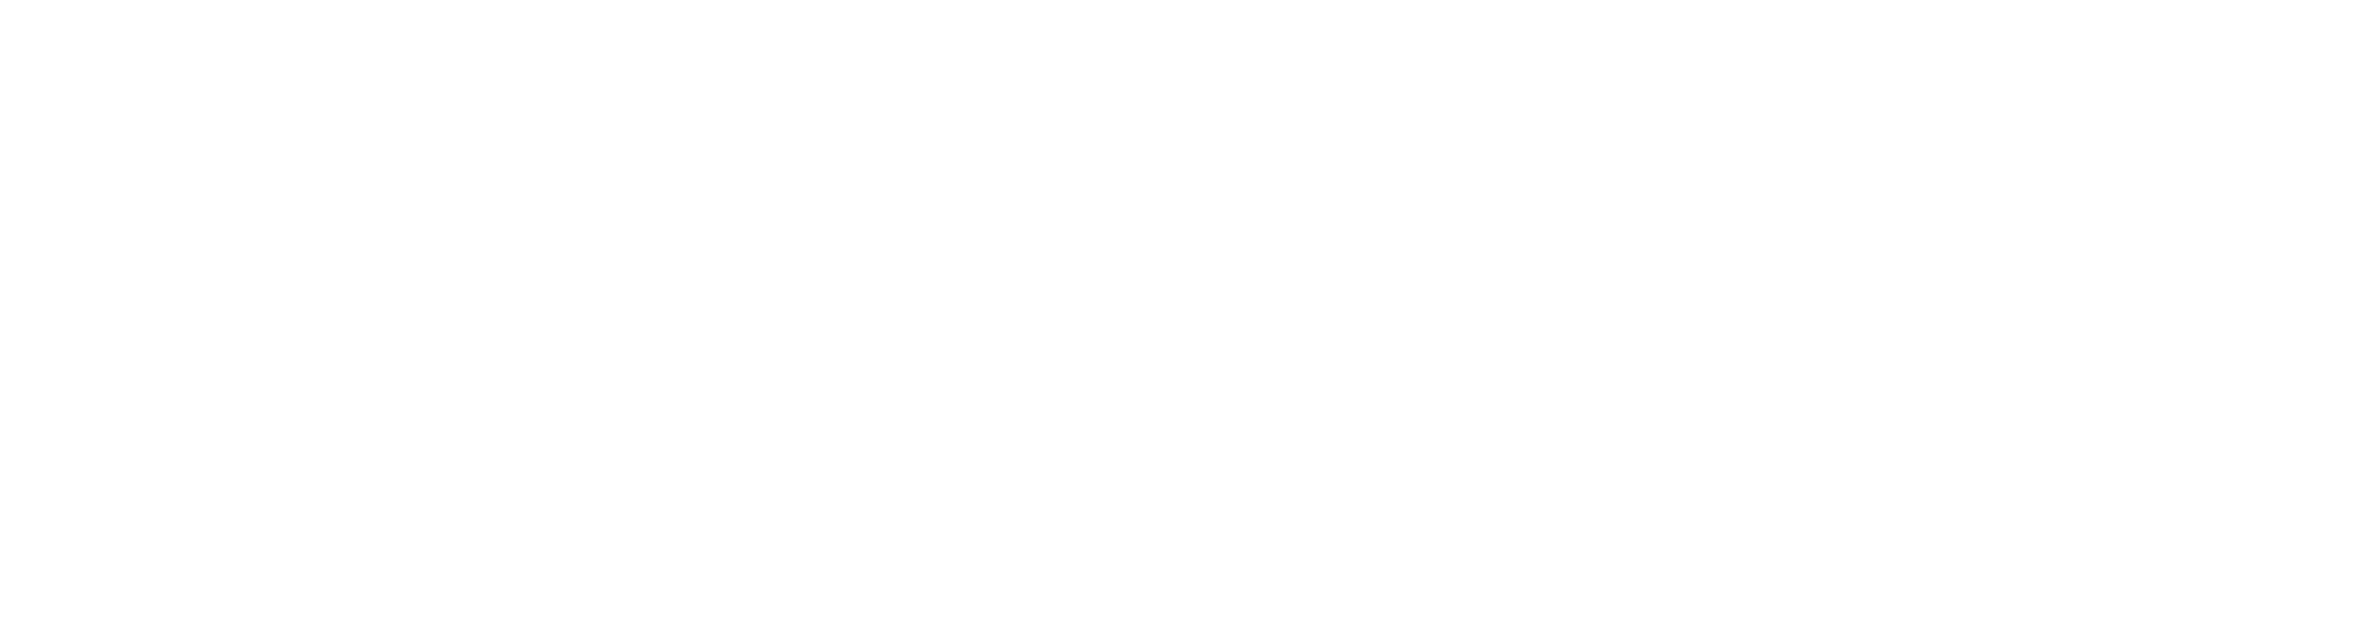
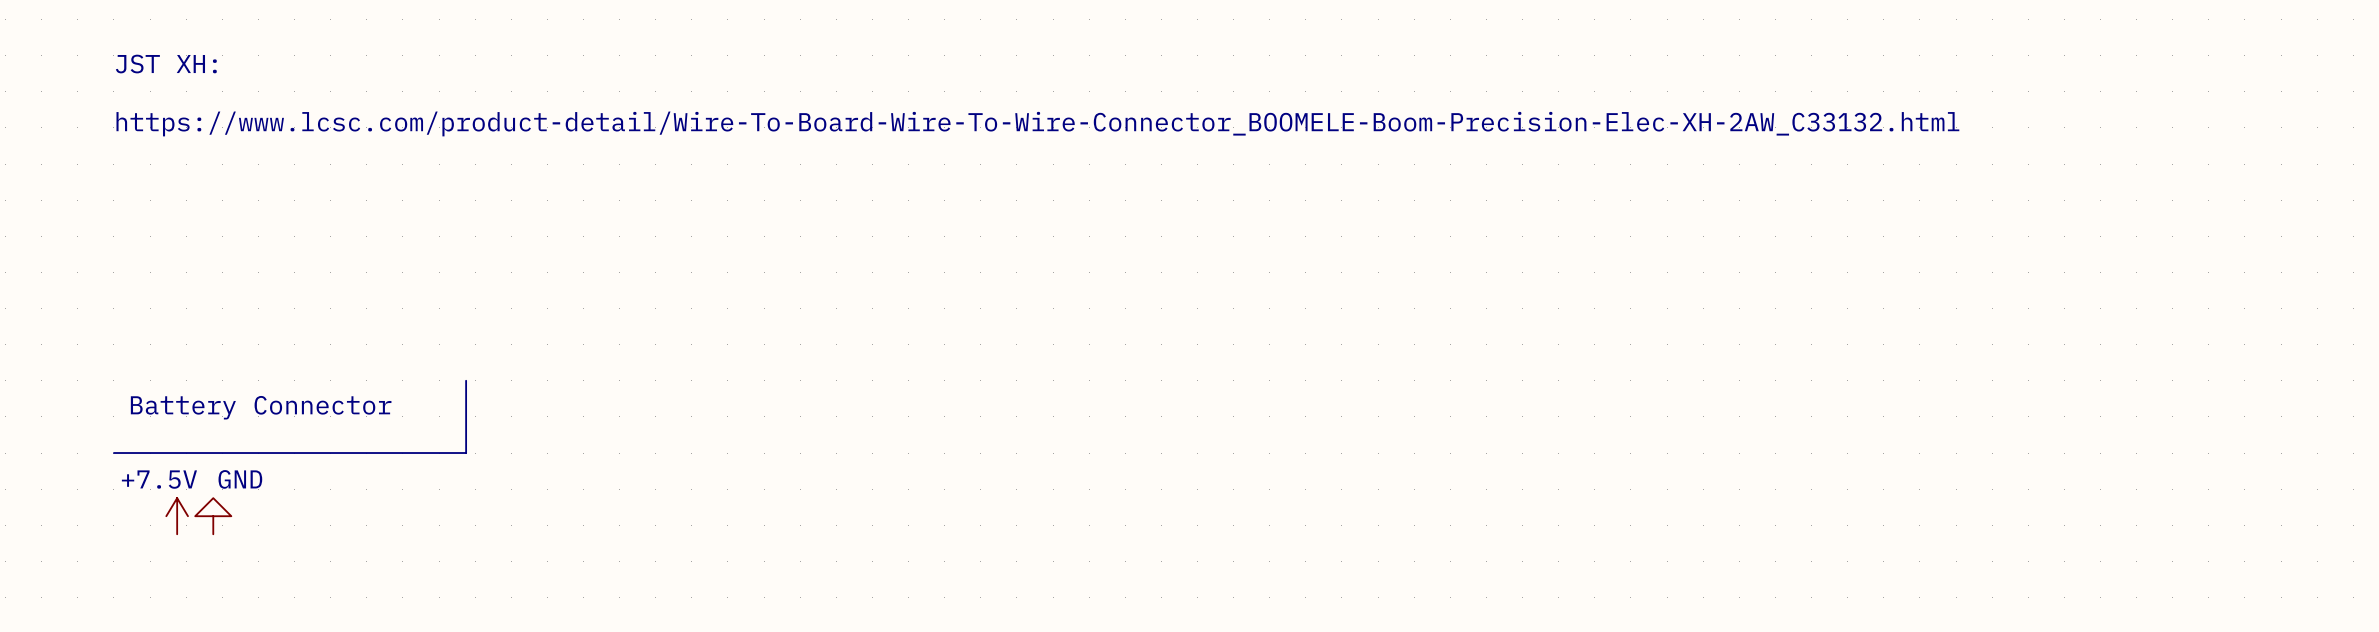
text: none -> JST XH: (166, 64)
text: none -> https://www.lcsc.com/product-detail/Wire-To-Board-Wire-To-Wire-Connector_BOOMELE-Boom-Precision-Elec-XH-2AW_C33132.html (1037, 123)
line: none -> (466, 380) (466, 453) (113, 453)
text: none -> Battery Connector (261, 407)
power symbol: none -> +7.5V (177, 516)
power symbol: none -> GND (213, 516)

